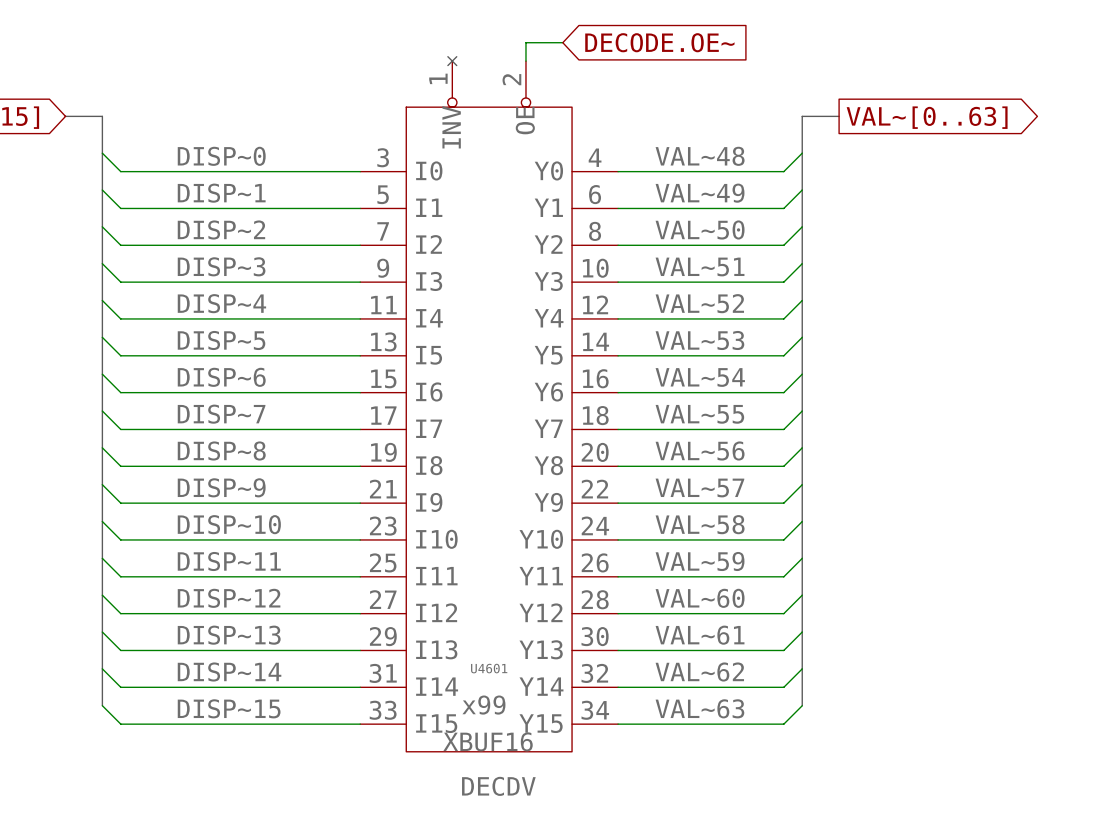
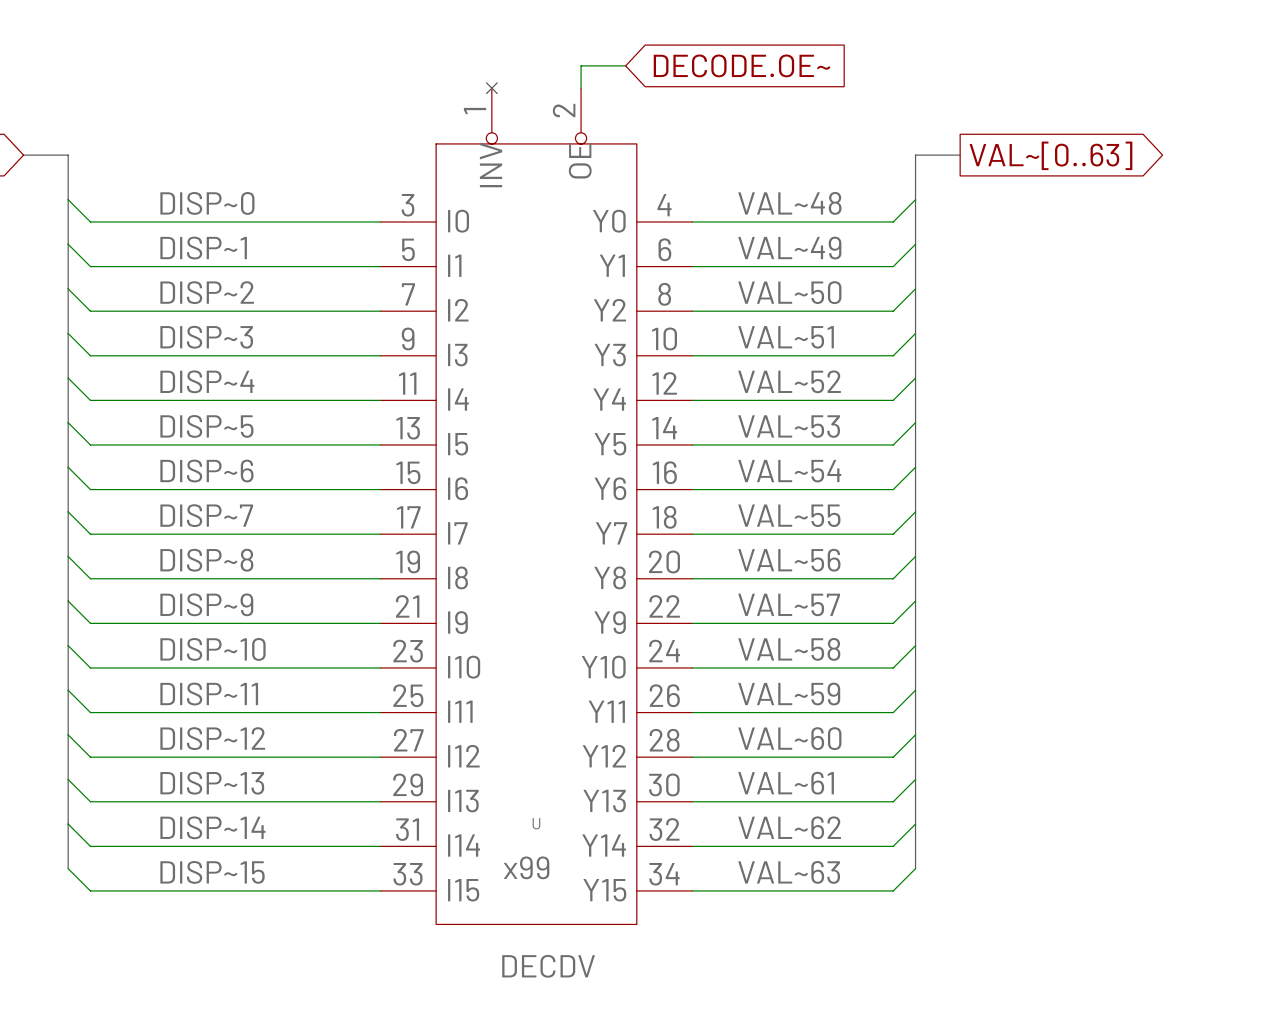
U4601 name: U4601 (489, 668) -> U (536, 823)
U4601 value: XBUF16 (488, 741) -> none

